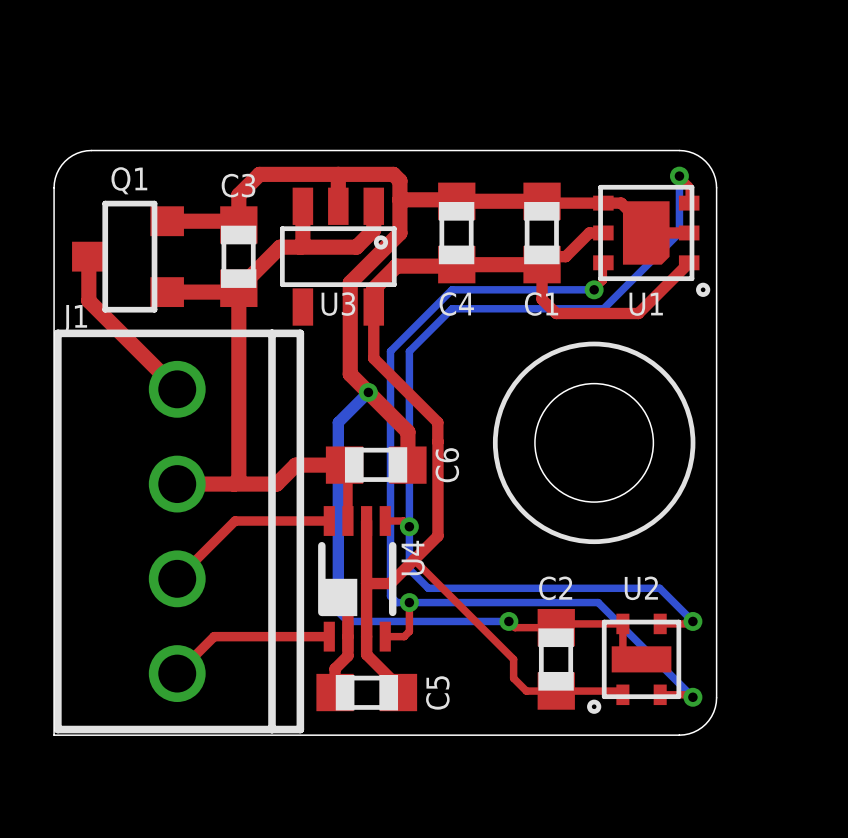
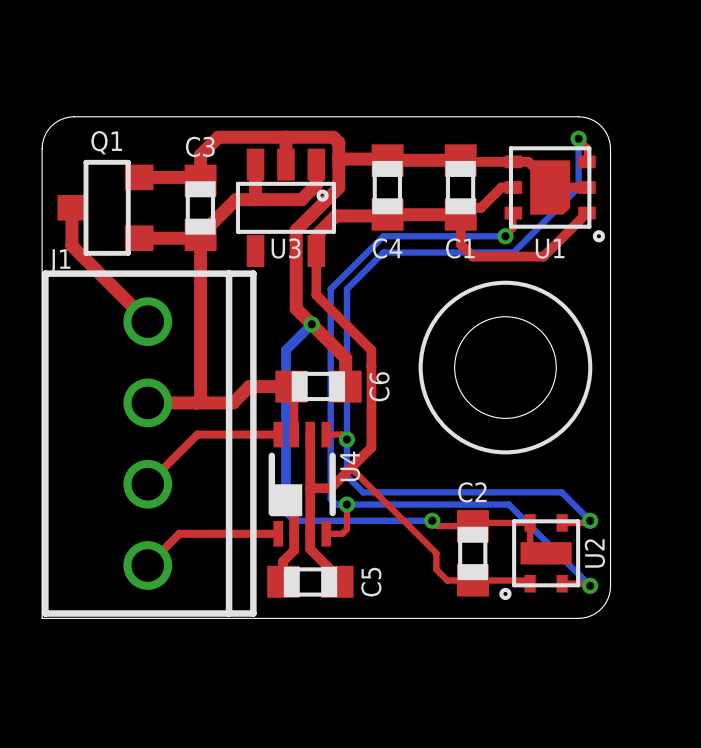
U2 name rotation: 0° (641, 588) -> 90° counterclockwise (594, 553)
U2 name position: U2 (641, 588) -> U2 (594, 553)

